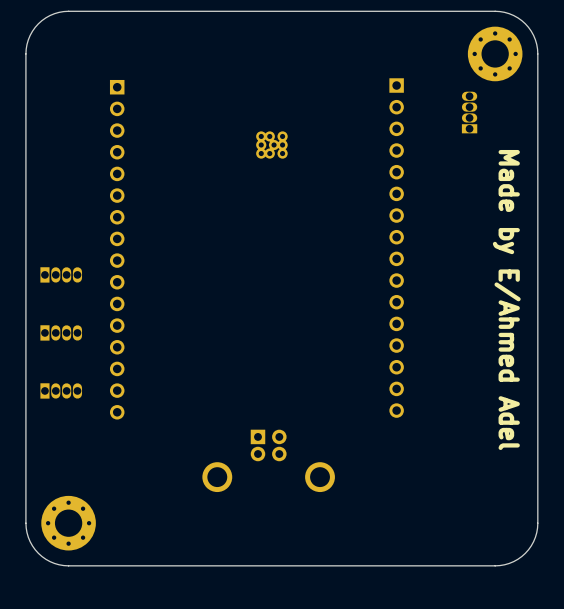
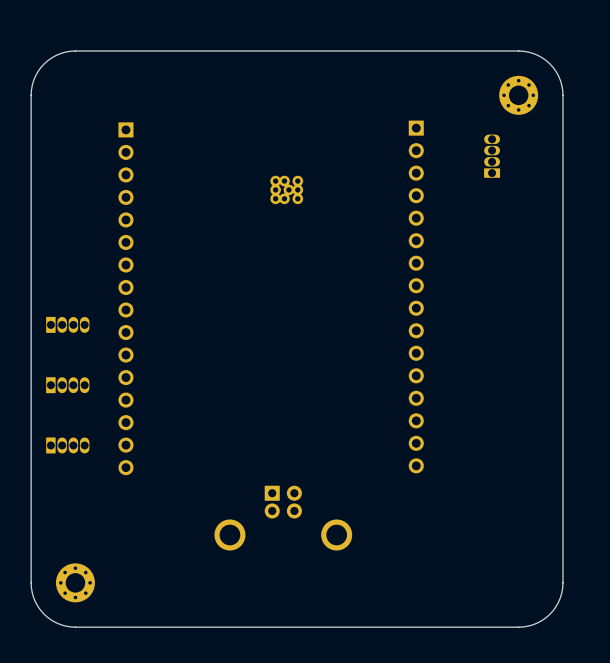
part footprint: [467, 26, 523, 82] -> [499, 75, 539, 115]
text: Made by E/Ahmed Adel (506, 299) -> none
part footprint: [41, 495, 96, 551] -> [55, 563, 95, 603]

